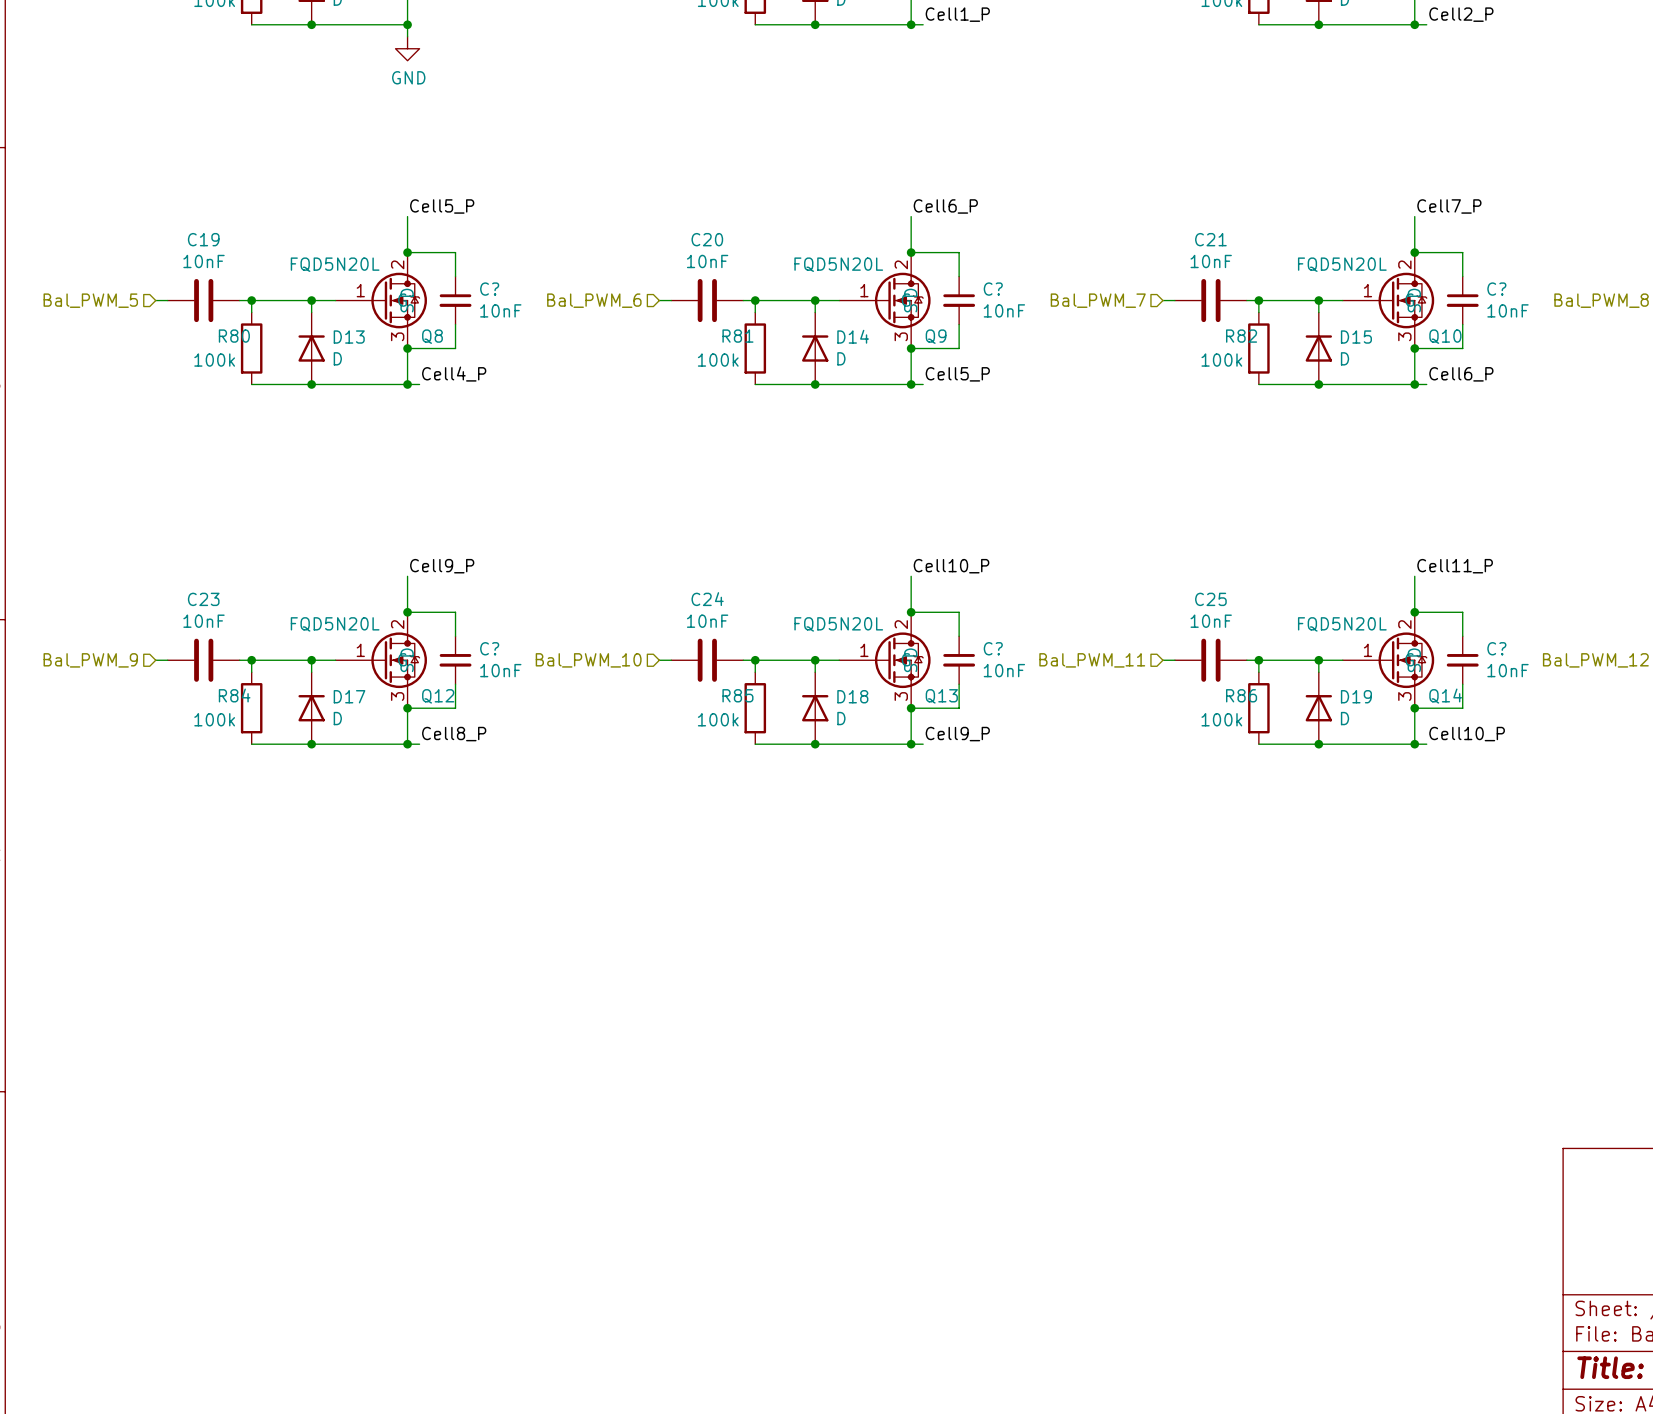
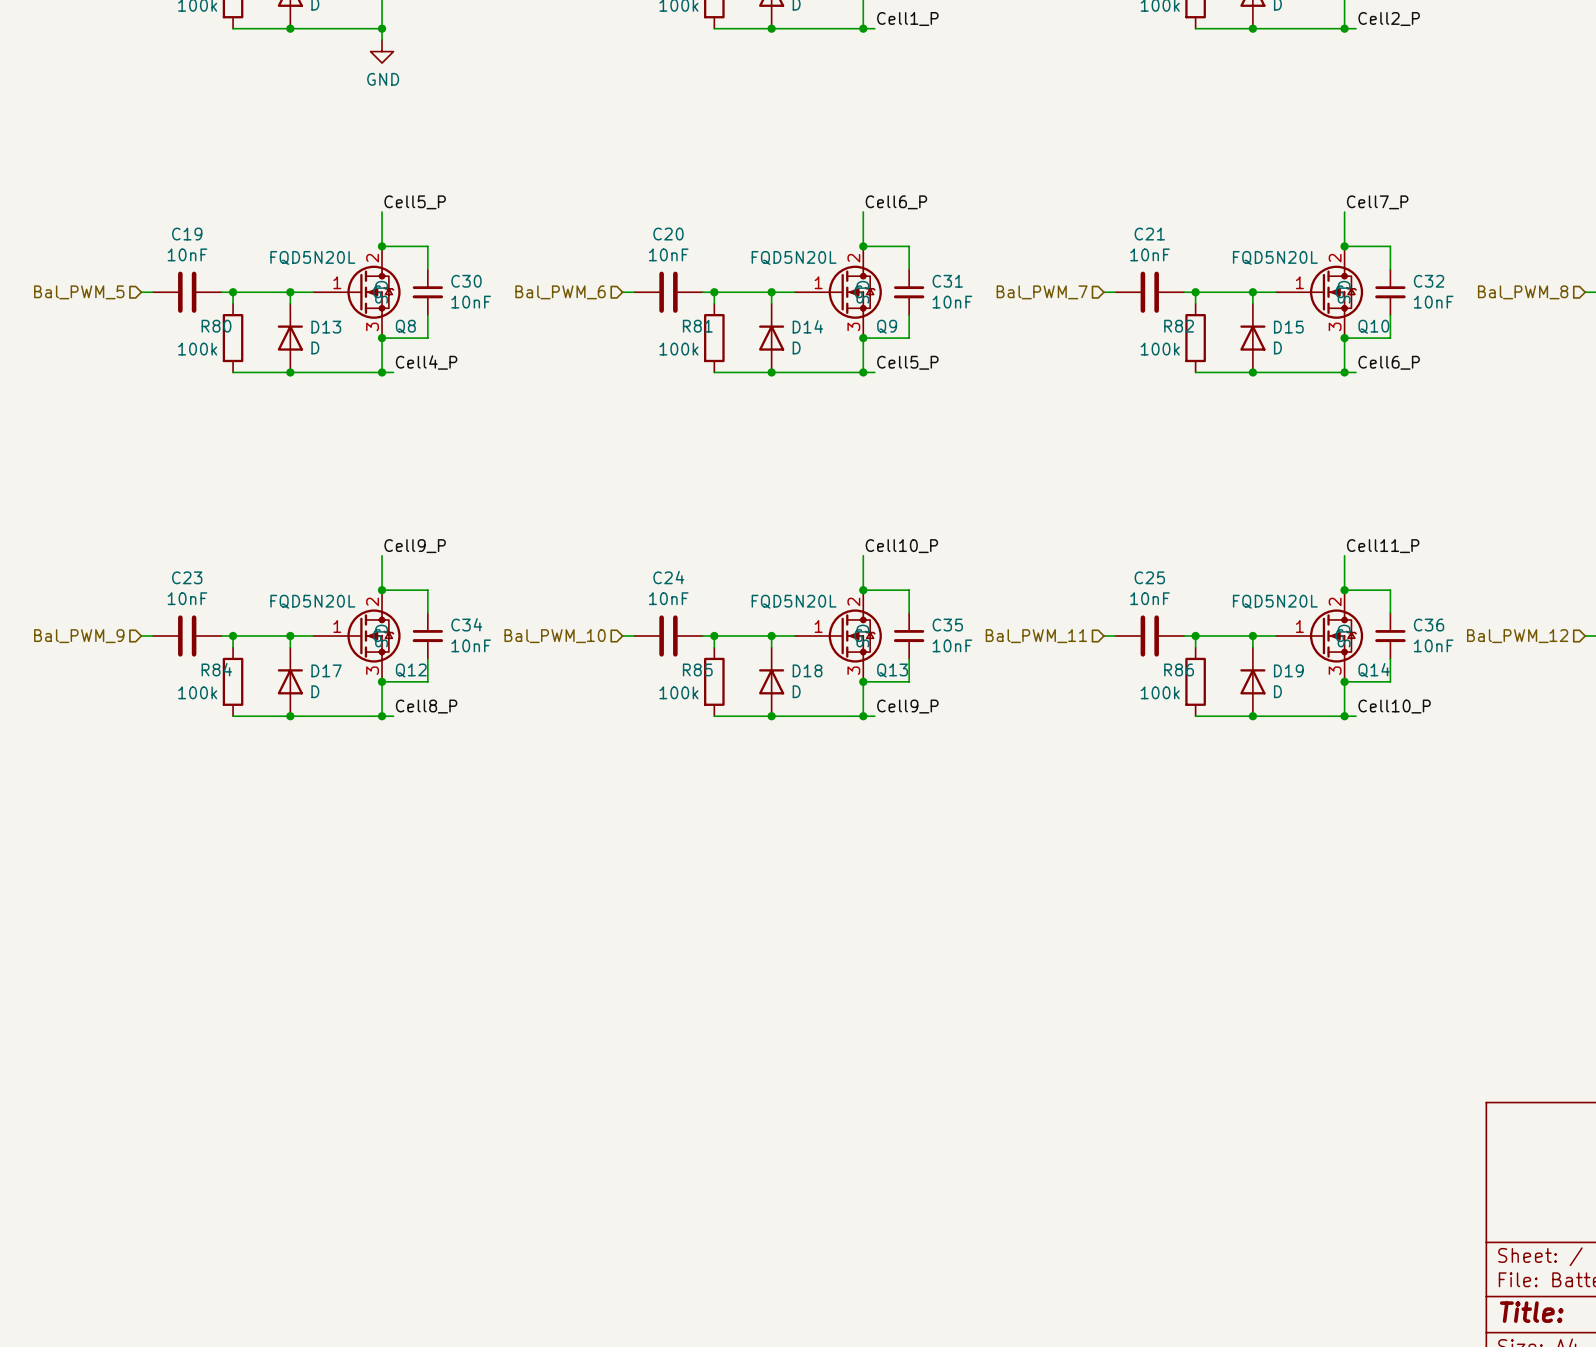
C? name: C? (489, 289) -> C30 (466, 281)
C? name: C? (993, 289) -> C31 (947, 281)
C? name: C? (1496, 289) -> C32 (1429, 281)
C? name: C? (489, 648) -> C34 (466, 624)
C? name: C? (993, 648) -> C35 (947, 625)
C? name: C? (1496, 648) -> C36 (1429, 625)

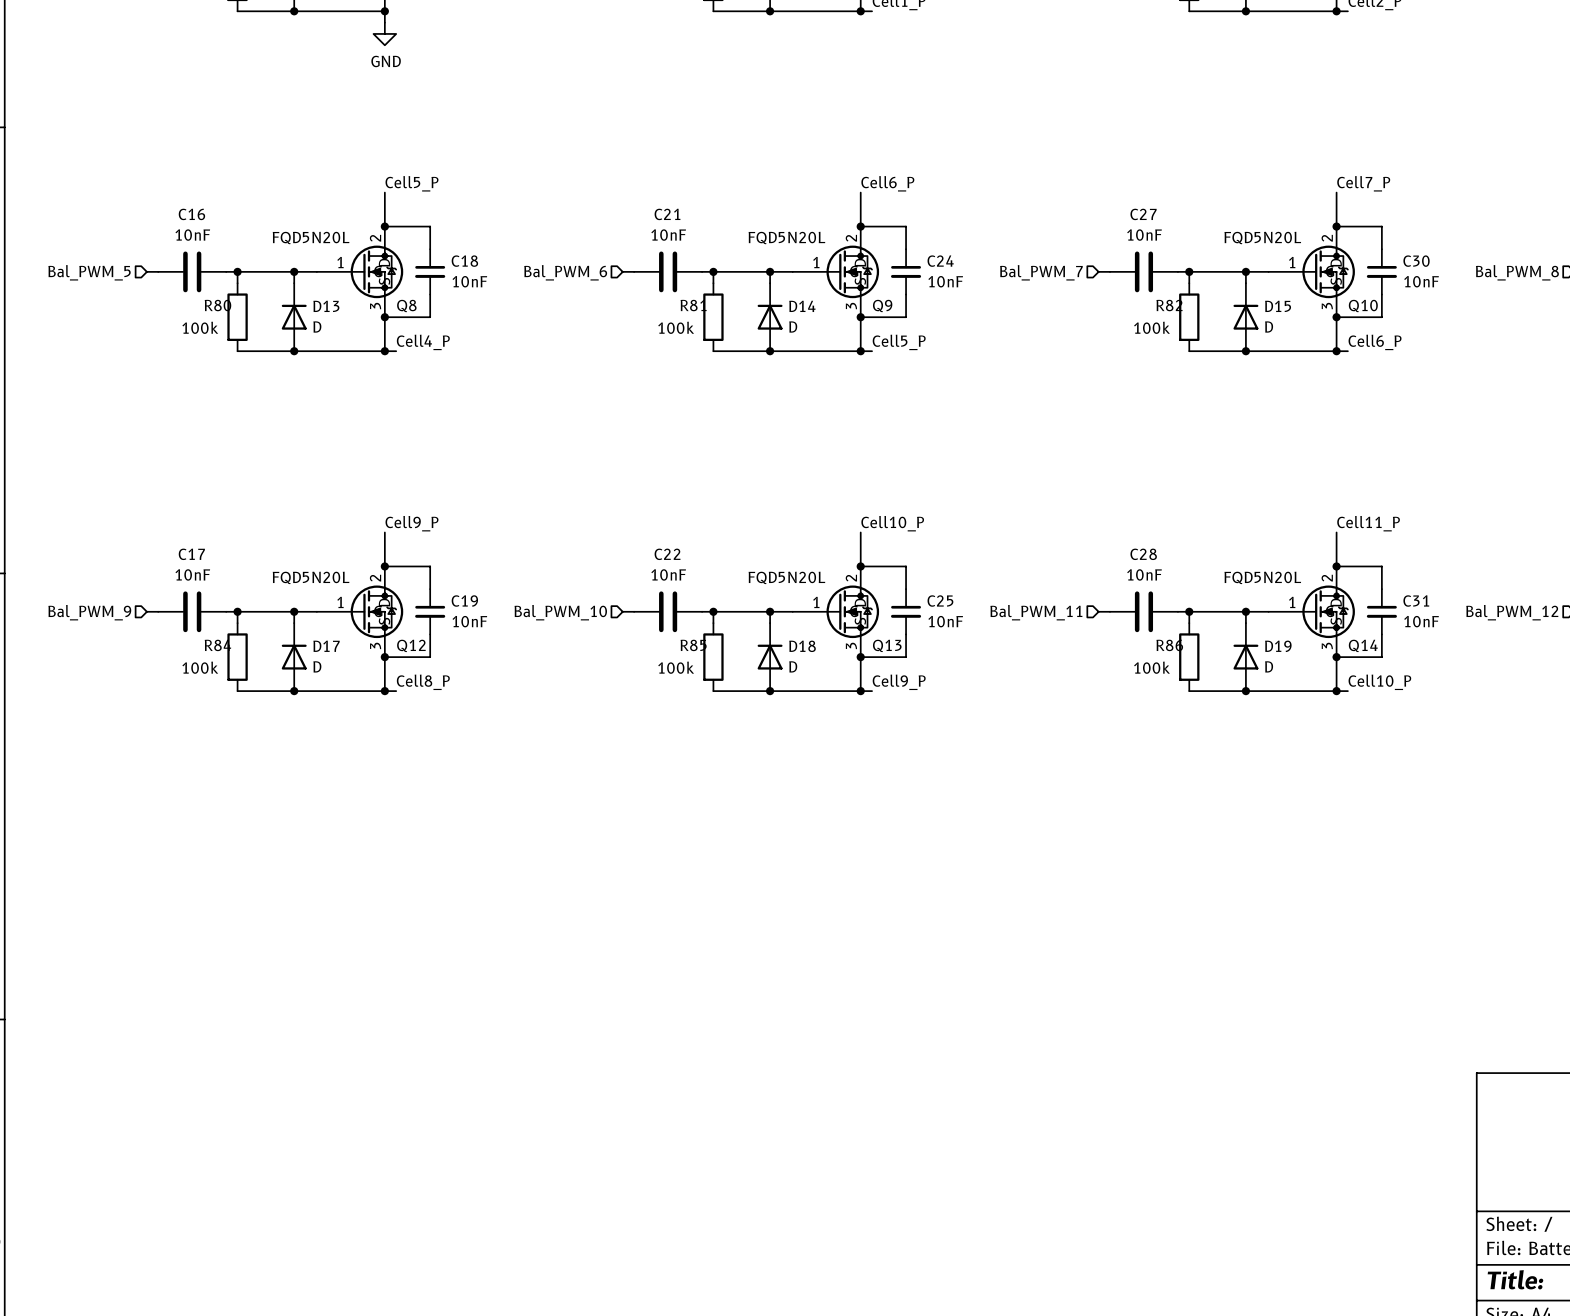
C19 name: C19 (187, 234) -> C16 (191, 214)
C20 name: C20 (668, 234) -> C21 (667, 214)
C21 name: C21 (1149, 234) -> C27 (1143, 214)
C30 name: C30 (466, 281) -> C18 (464, 261)
C31 name: C31 (947, 281) -> C24 (940, 261)
C32 name: C32 (1429, 281) -> C30 (1416, 261)
C23 name: C23 (187, 577) -> C17 (191, 554)
C24 name: C24 (668, 577) -> C22 (667, 554)
C25 name: C25 (1149, 577) -> C28 (1143, 554)
C34 name: C34 (466, 624) -> C19 (464, 601)
C35 name: C35 (947, 625) -> C25 (940, 601)
C36 name: C36 (1429, 625) -> C31 (1416, 601)

